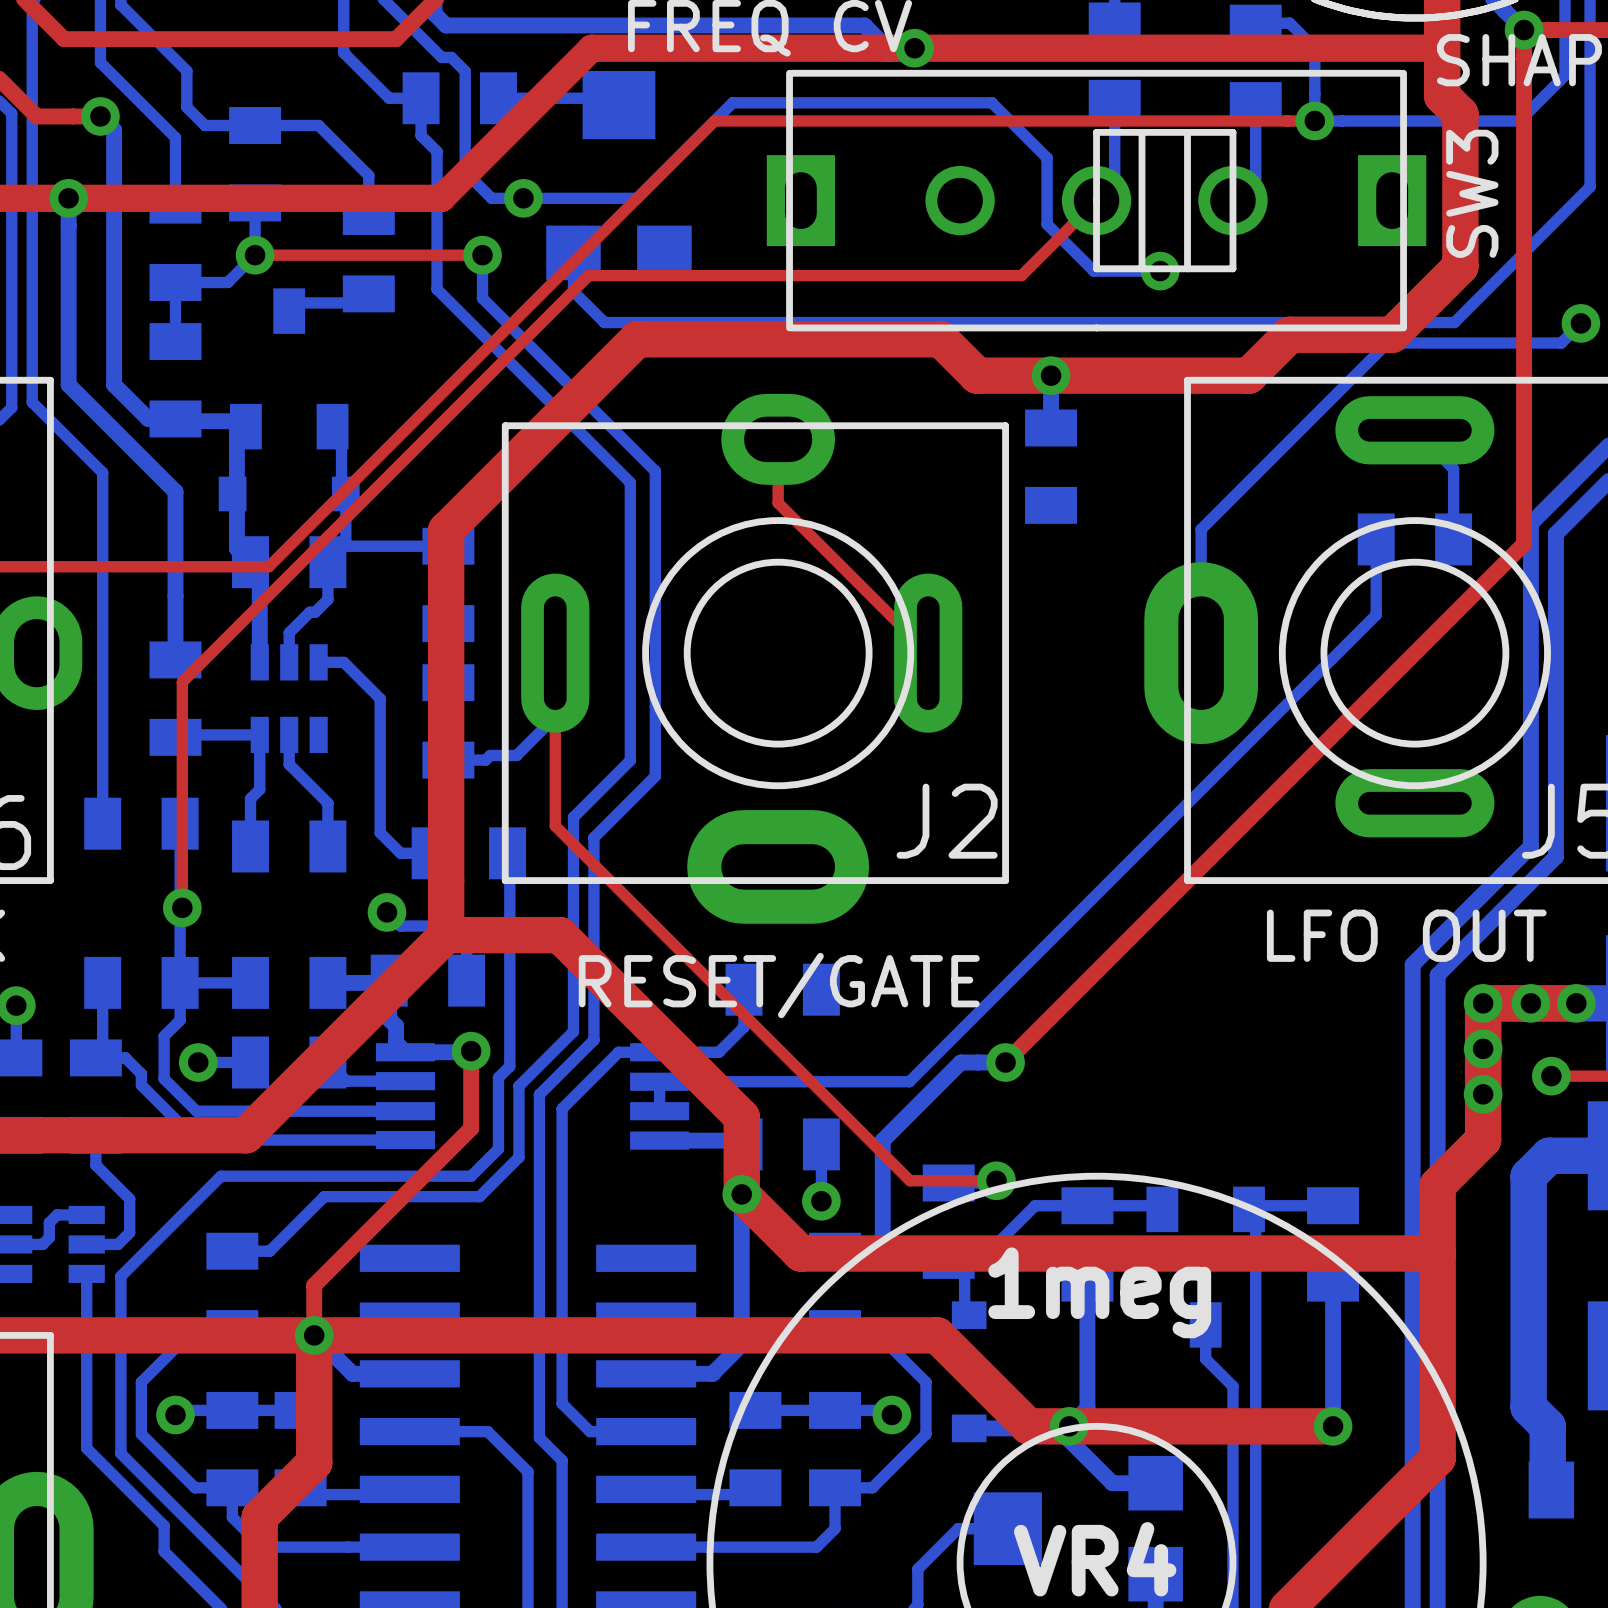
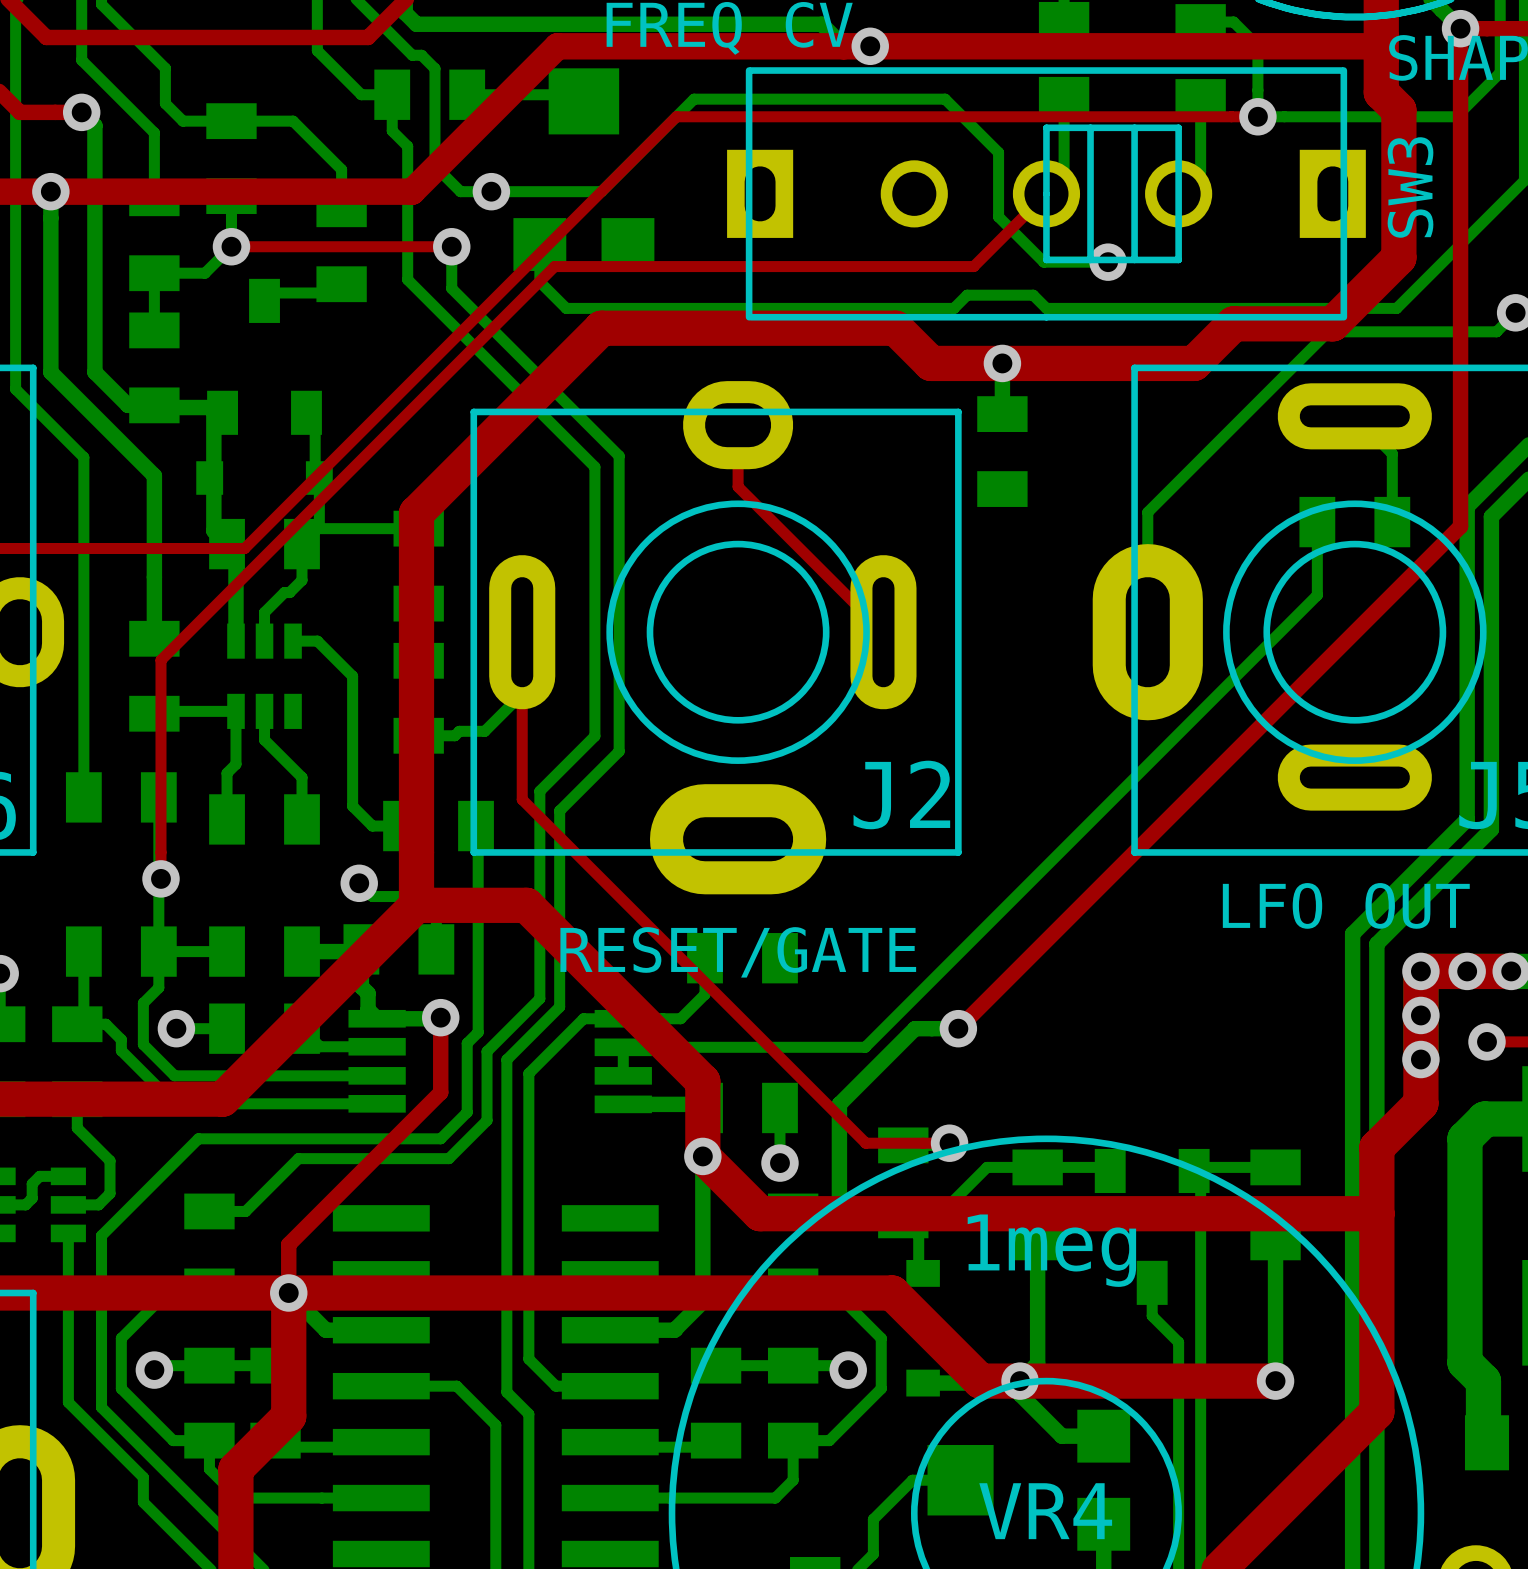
bottom track: (600, 318) (604, 322) (1454, 322) (1458, 318) -> (566, 308) (953, 308) (967, 295) (1033, 295) (1046, 308) (1396, 308)

